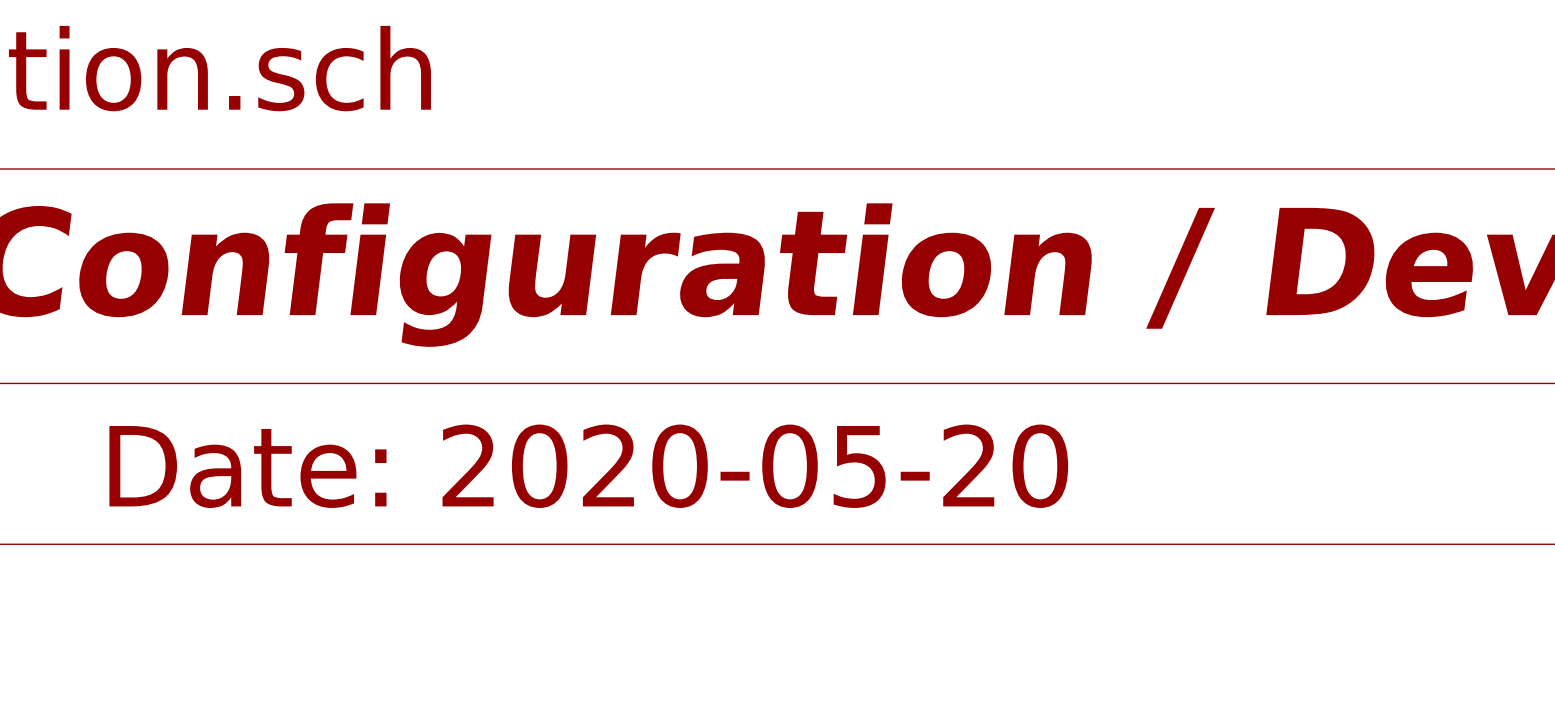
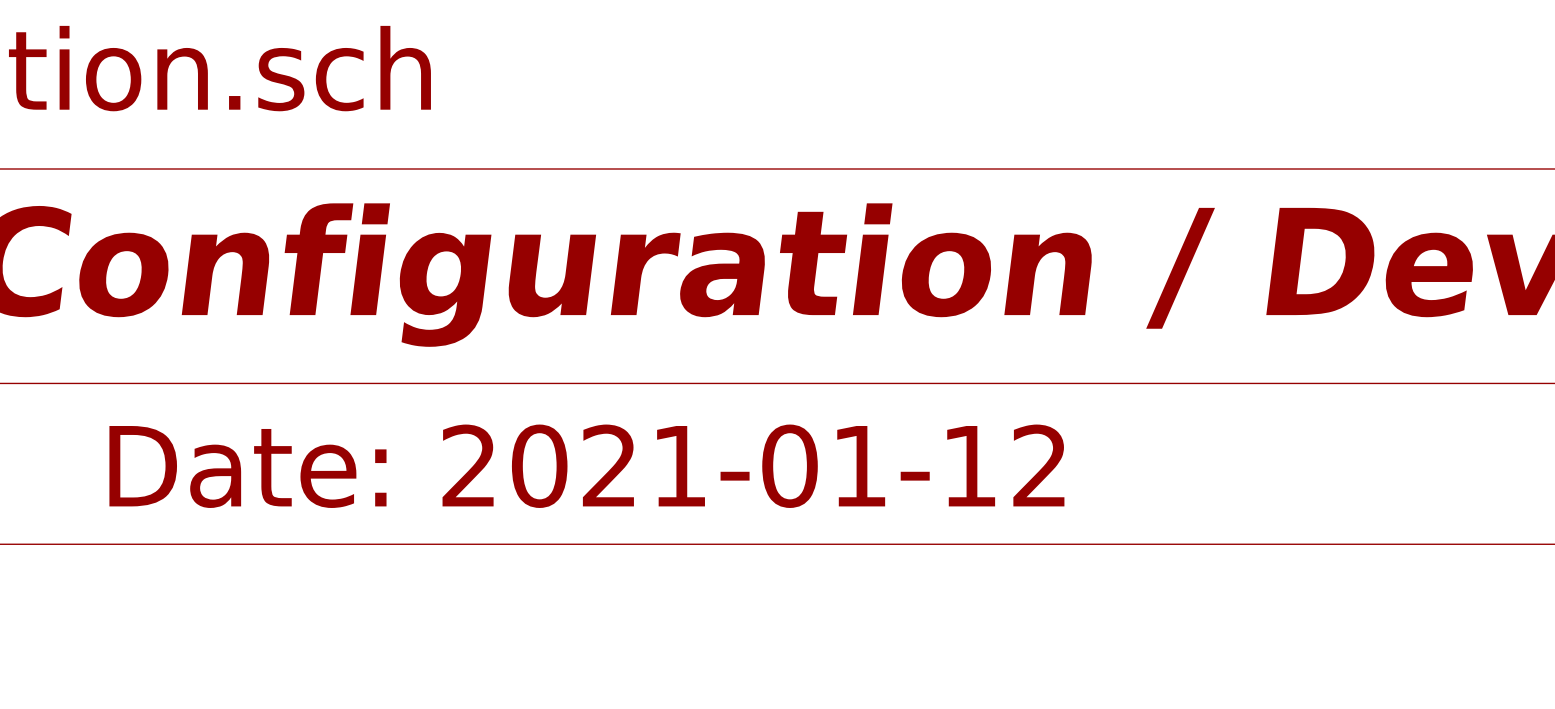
title block: Date: 2020-05-20 (588, 466) -> Date: 2021-01-12 (586, 466)

